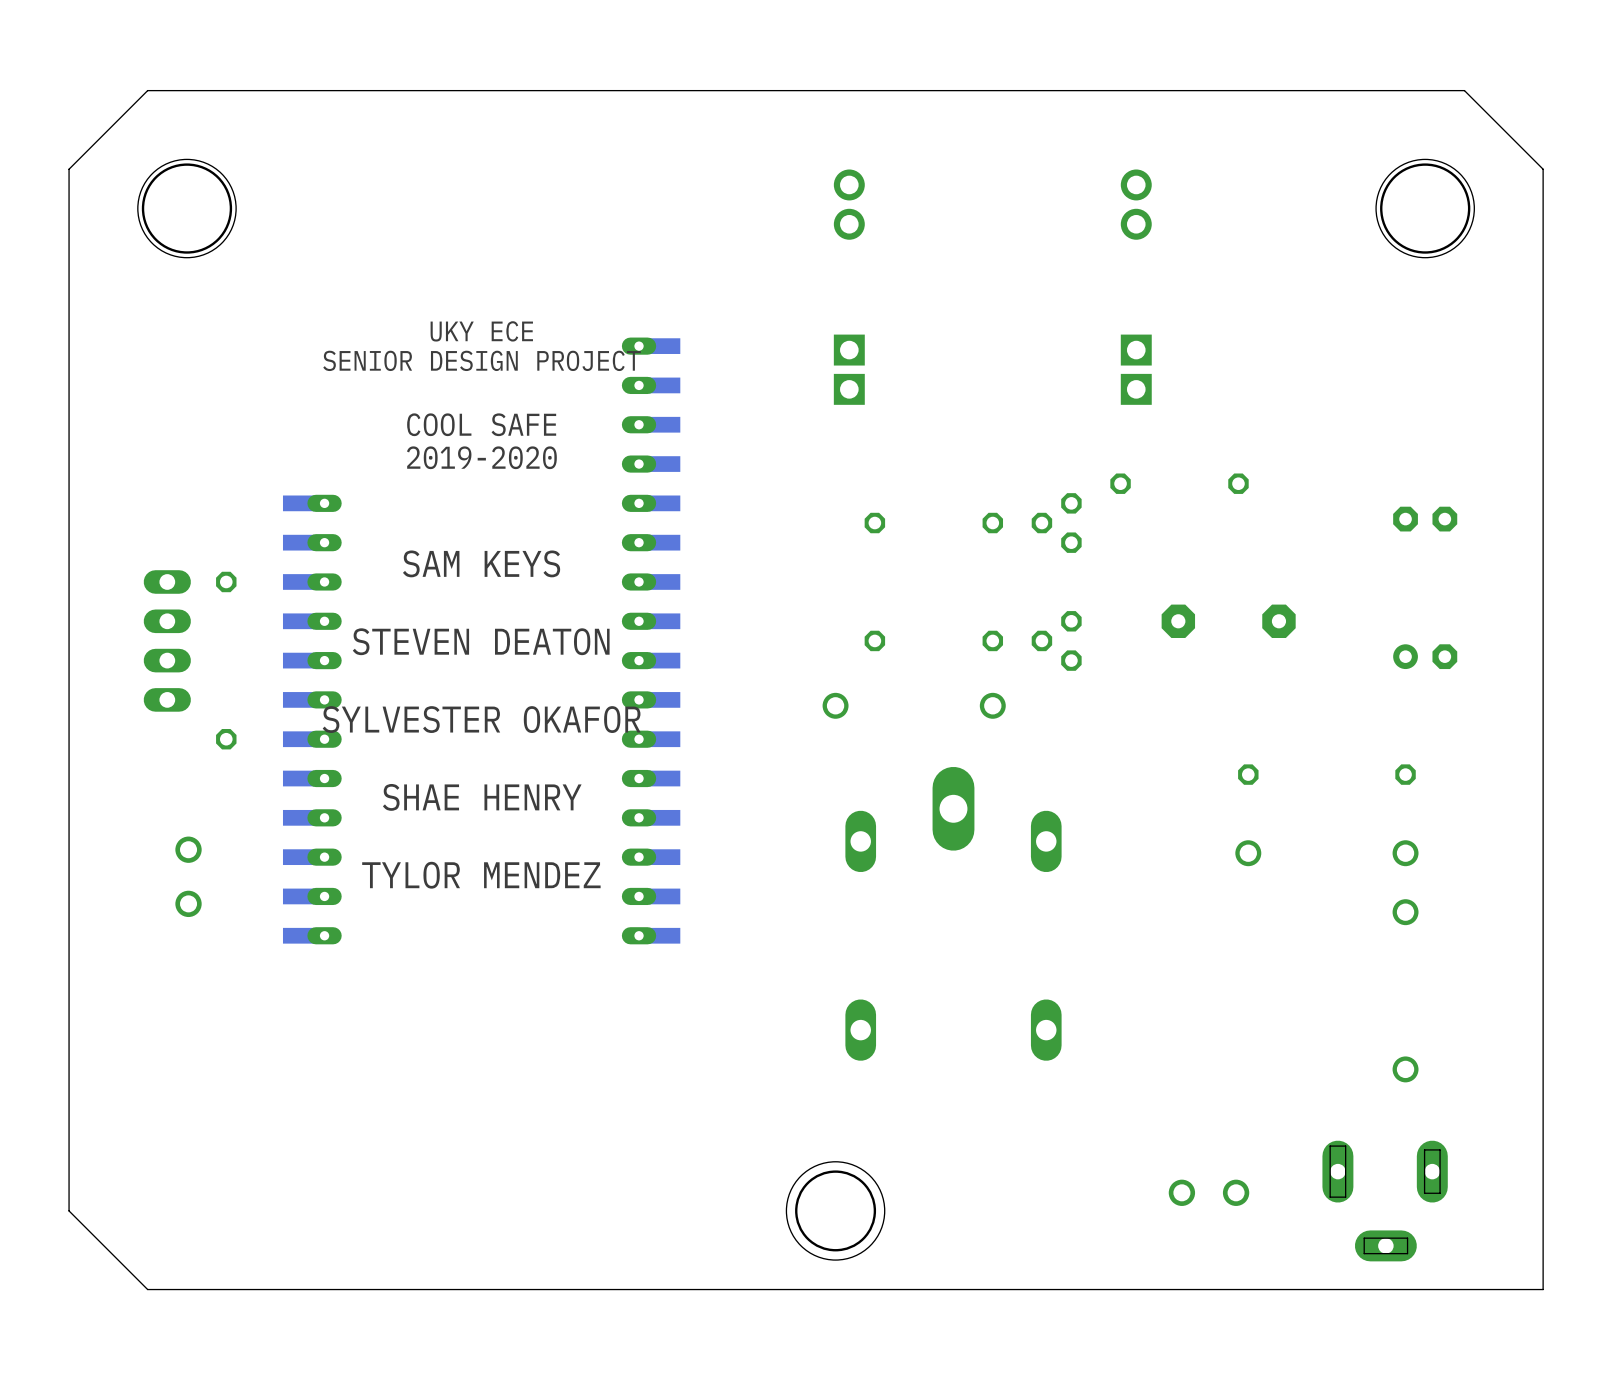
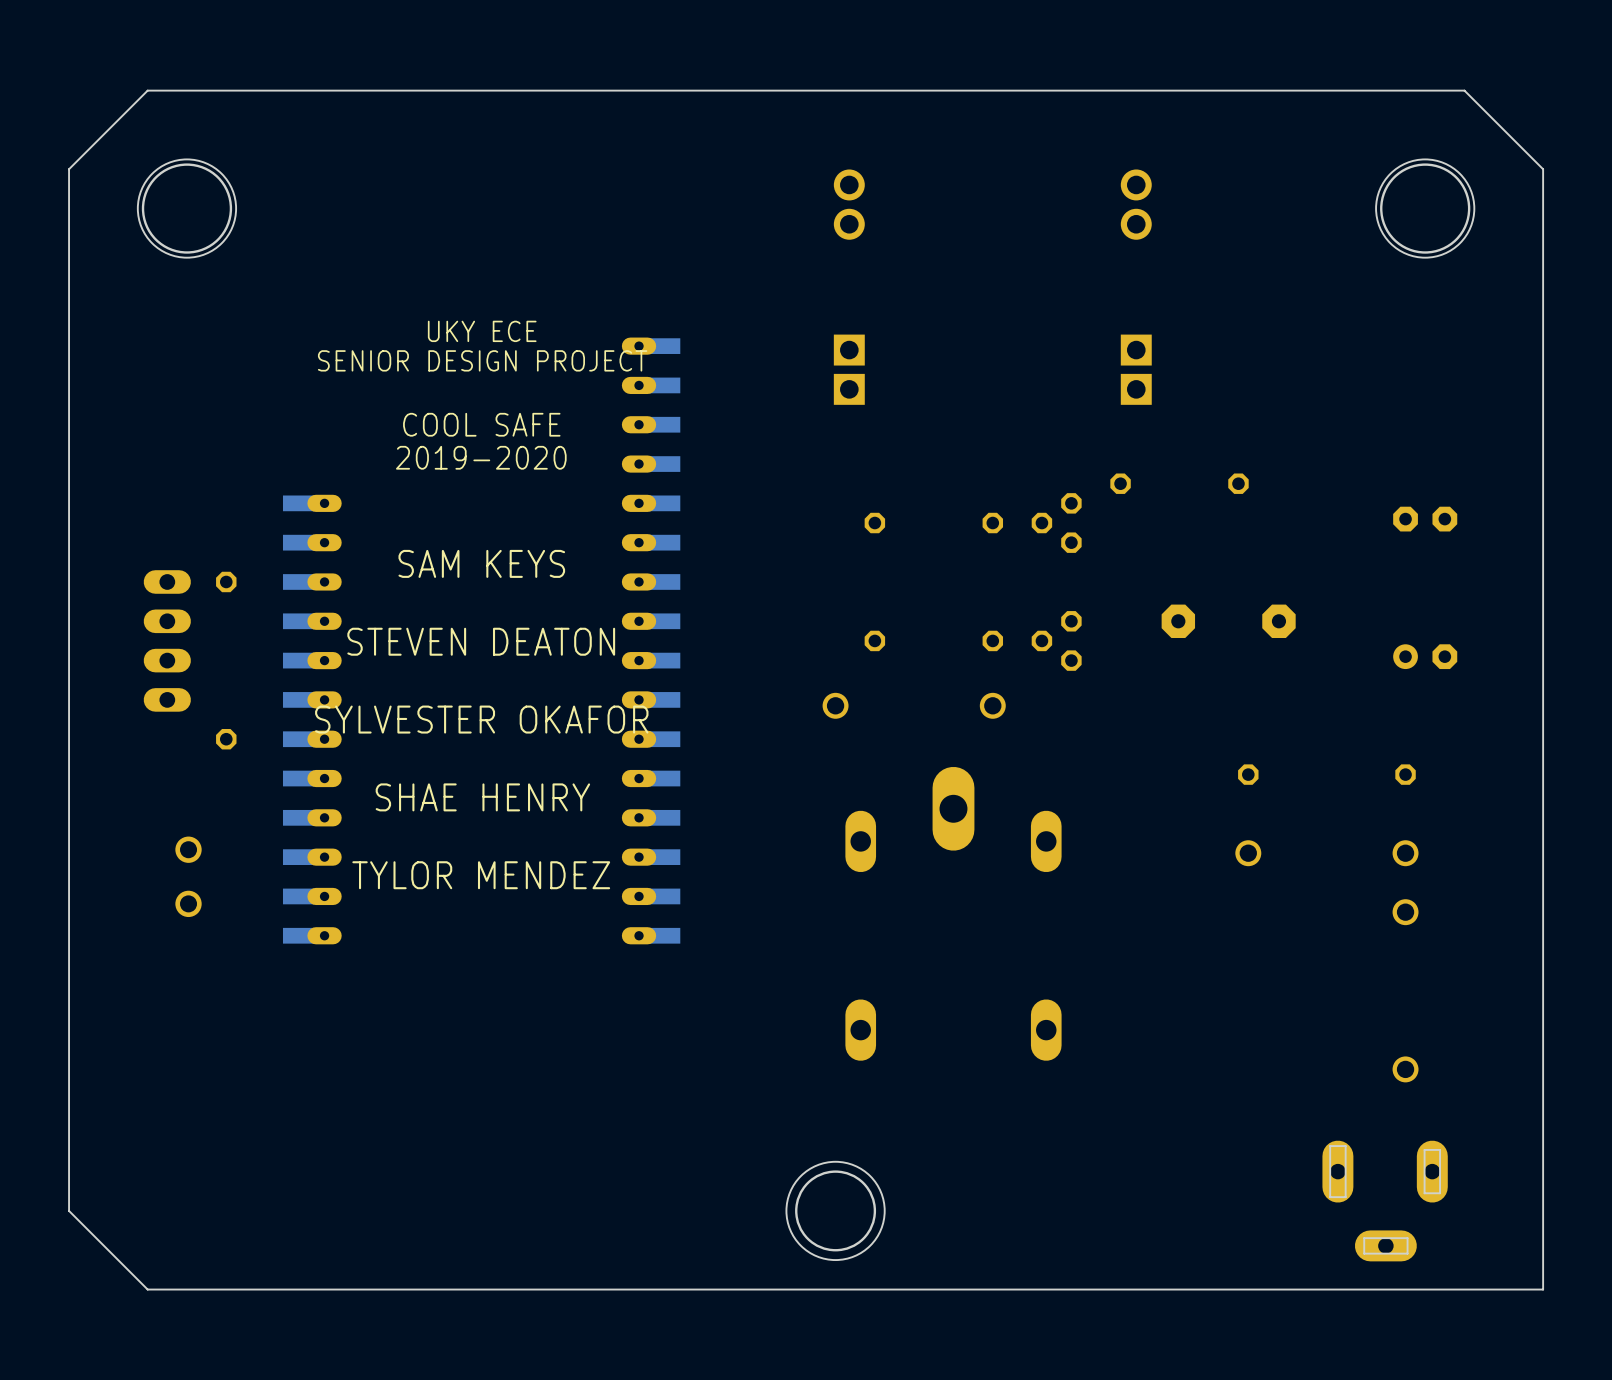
part: (1208, 1192) -> none

